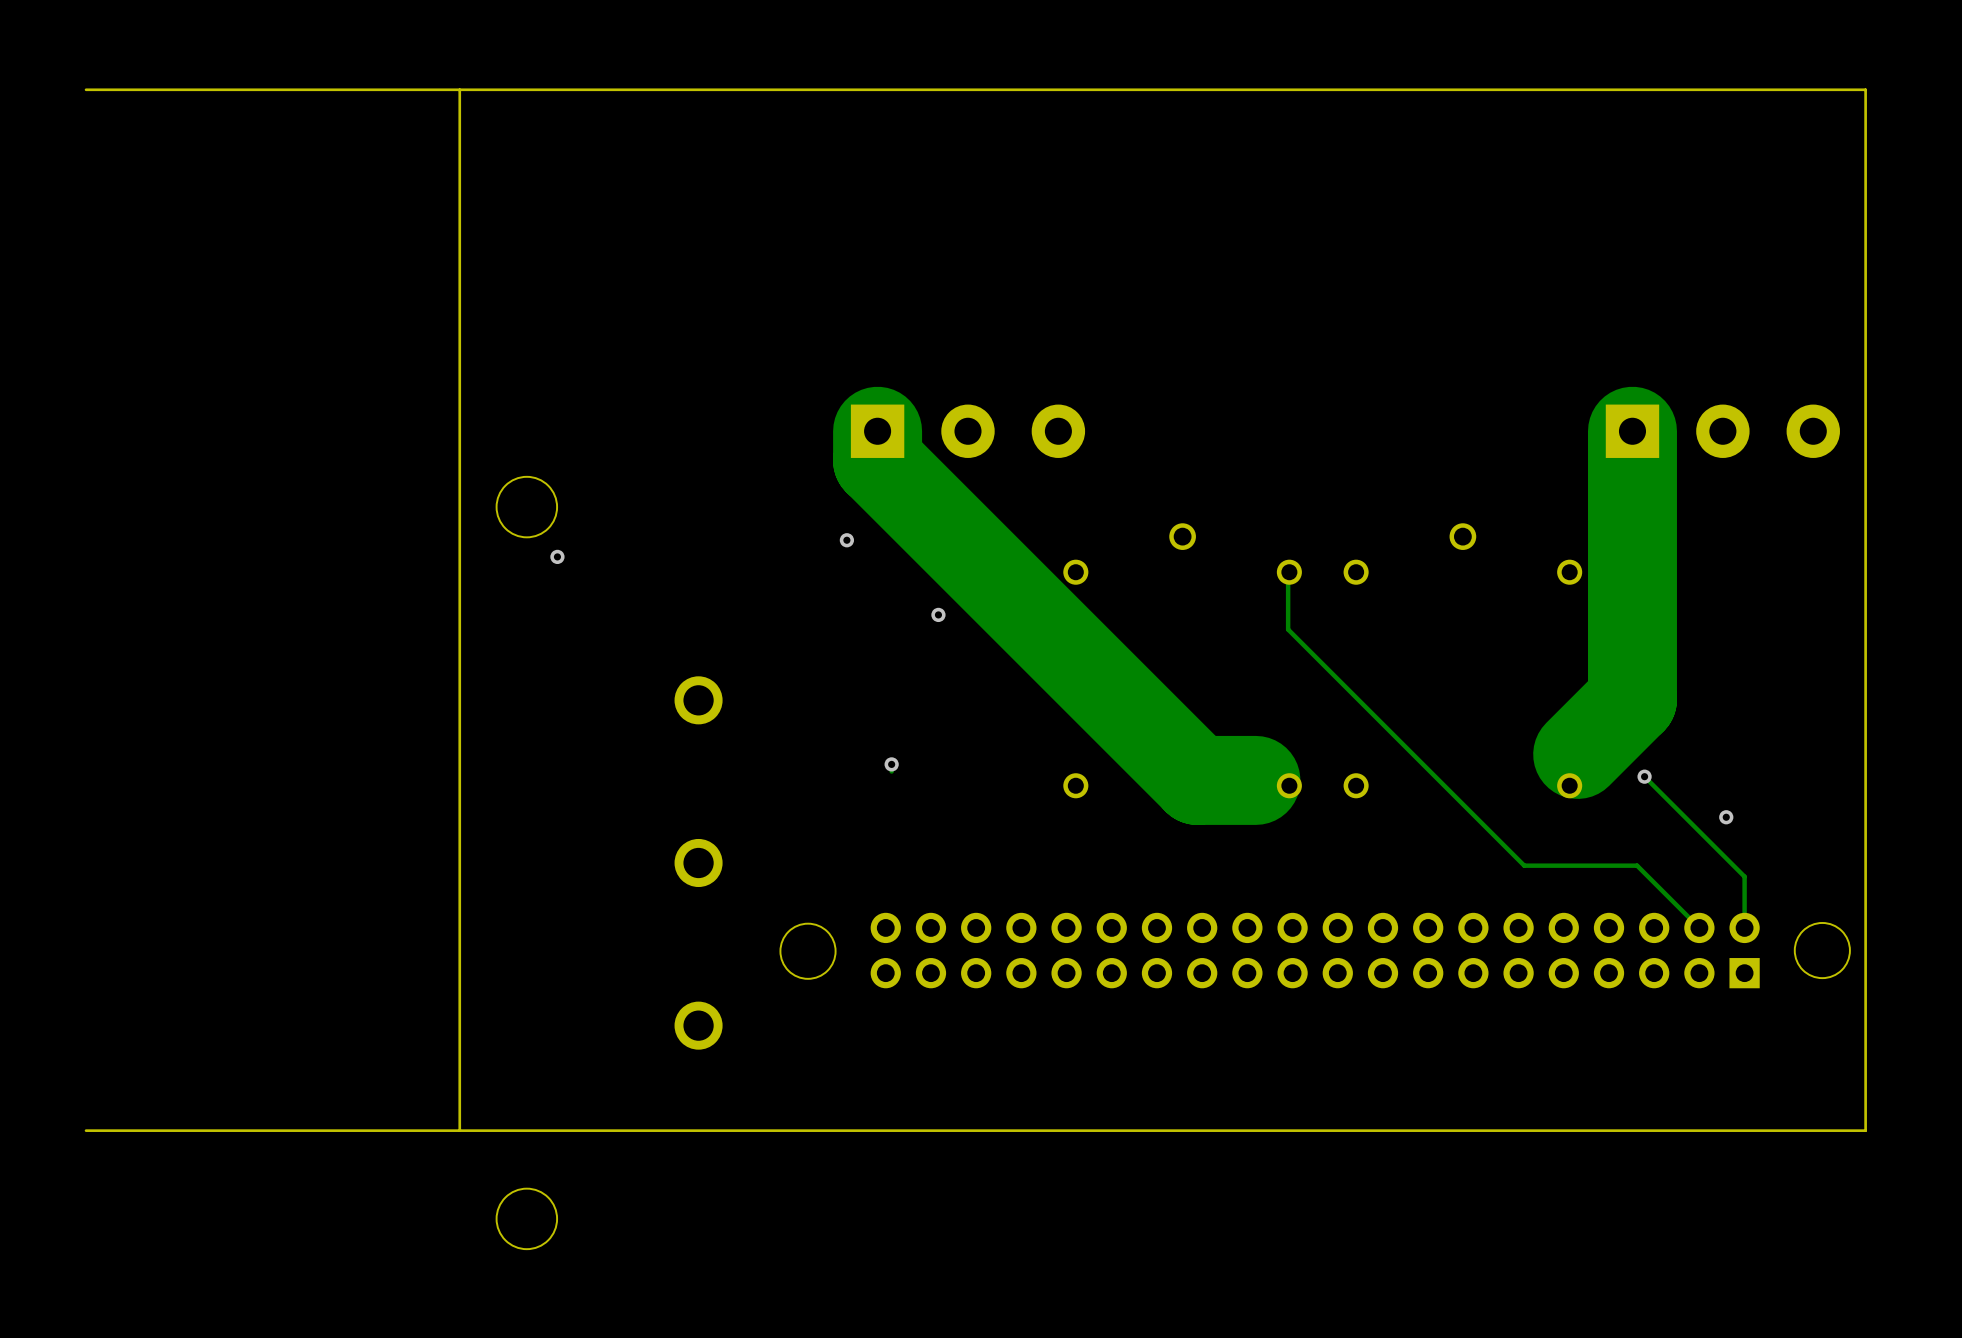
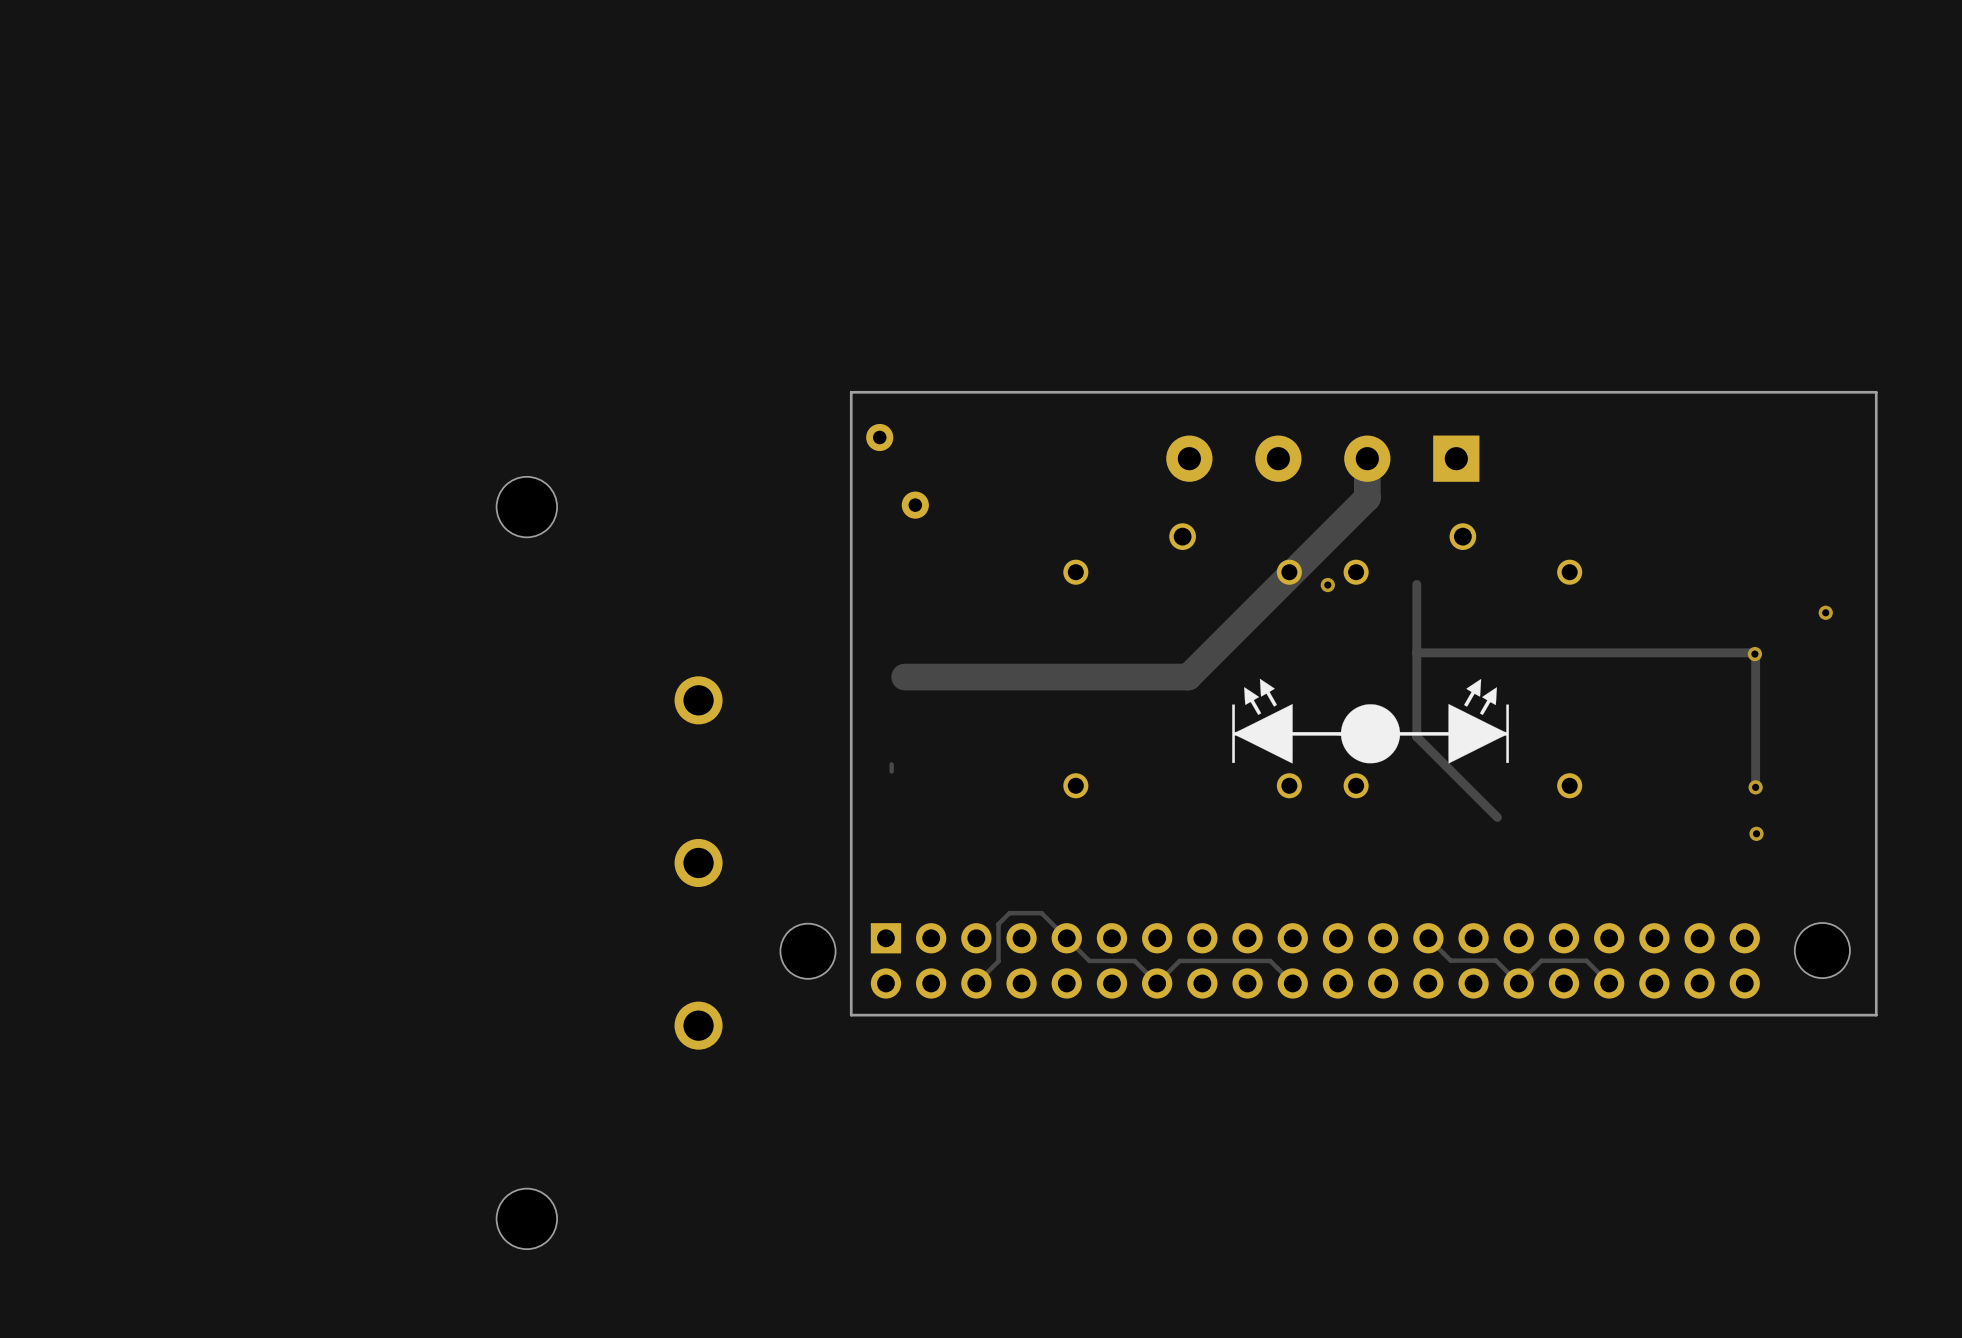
board edge: (86, 89) (1865, 89) (1865, 1130) (86, 1130) -> none
board edge: (459, 89) (459, 1130) -> none
board edge: none -> (1876, 392) (1876, 1015) (851, 1015) (851, 392) (1876, 392)
track: (877, 431) (877, 460) (1197, 780) (1255, 780) -> none
part: (967, 431) -> none
track: (1632, 431) (1632, 699) (1569, 762) (1569, 786) -> none
part: (1722, 431) -> none
part: none -> (1322, 458)
track: none -> (1367, 458) (1367, 497) (1188, 677) (904, 677)
part: none -> (897, 471)
via: (846, 540) -> none
via: (557, 556) -> none
track: (1288, 568) (1288, 629) (1524, 865) (1637, 865) (1699, 927) -> none
track: none -> (1416, 584) (1416, 736) (1497, 817)
via: none -> (1327, 585)
via: none -> (1825, 612)
via: (938, 614) -> none
track: none -> (1755, 652) (1416, 652)
via: none -> (1754, 654)
track: none -> (1755, 657) (1755, 787)
drawing: none -> [1232, 678, 1509, 764]
via: (891, 764) -> none
track: (1644, 776) (1744, 876) (1744, 927) -> none
via: (1644, 776) -> none
via: none -> (1755, 787)
via: (1726, 817) -> none
via: none -> (1756, 833)
track: none -> (1428, 938) (1450, 960) (1495, 960) (1518, 983) (1541, 960) (1586, 960) (1609, 983)
part rotation: 0° (1315, 950) -> 180° (1315, 960)
track: none -> (1292, 983) (1270, 960) (1179, 960) (1157, 983) (1134, 960) (1089, 960) (1041, 913) (1009, 913) (998, 924) (998, 961) (976, 983)

